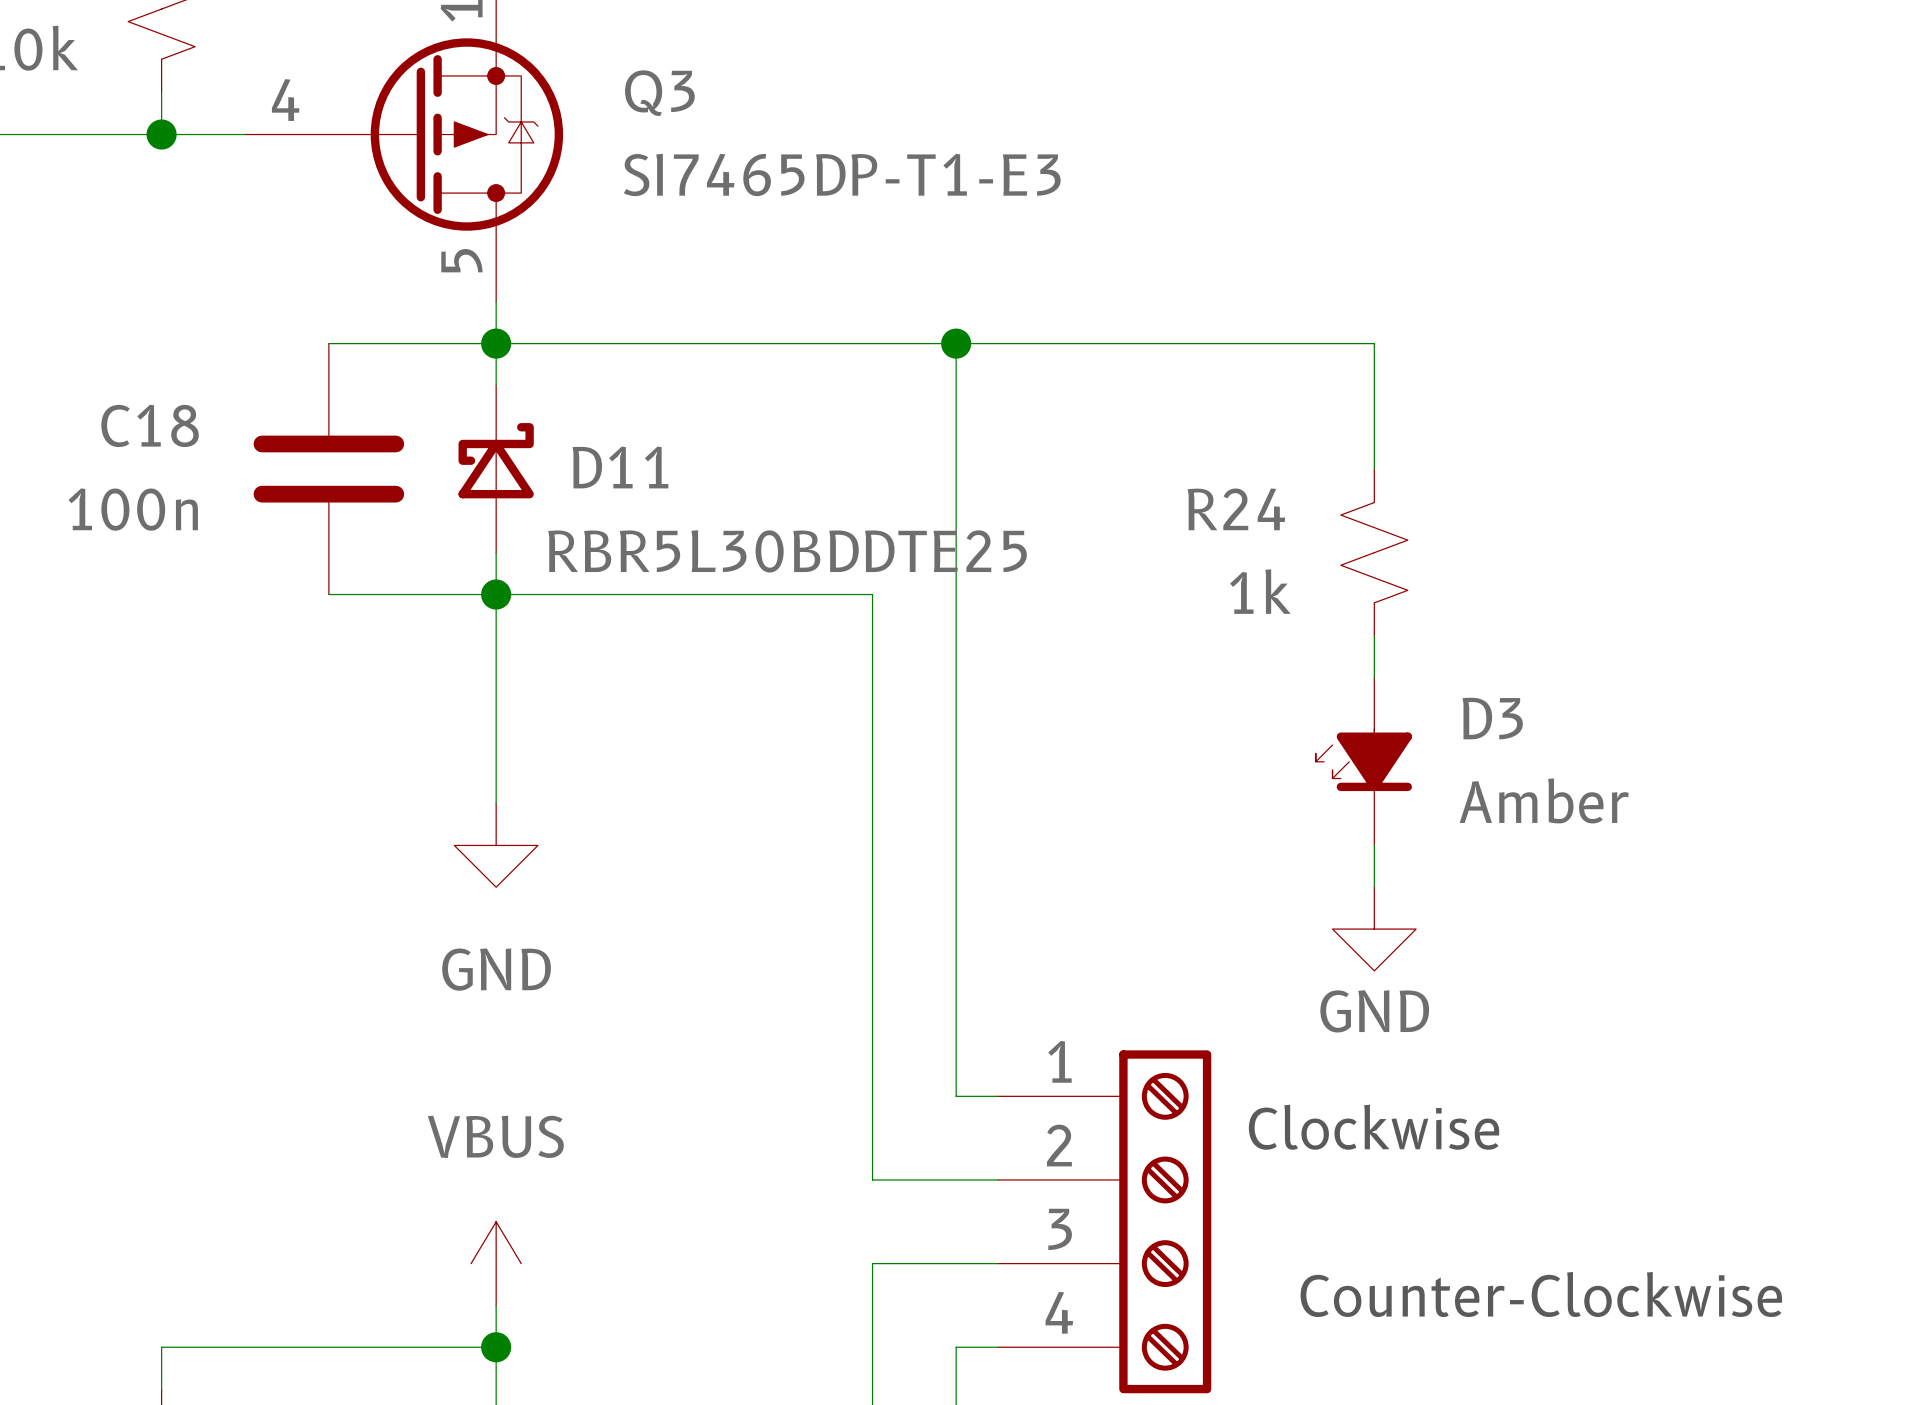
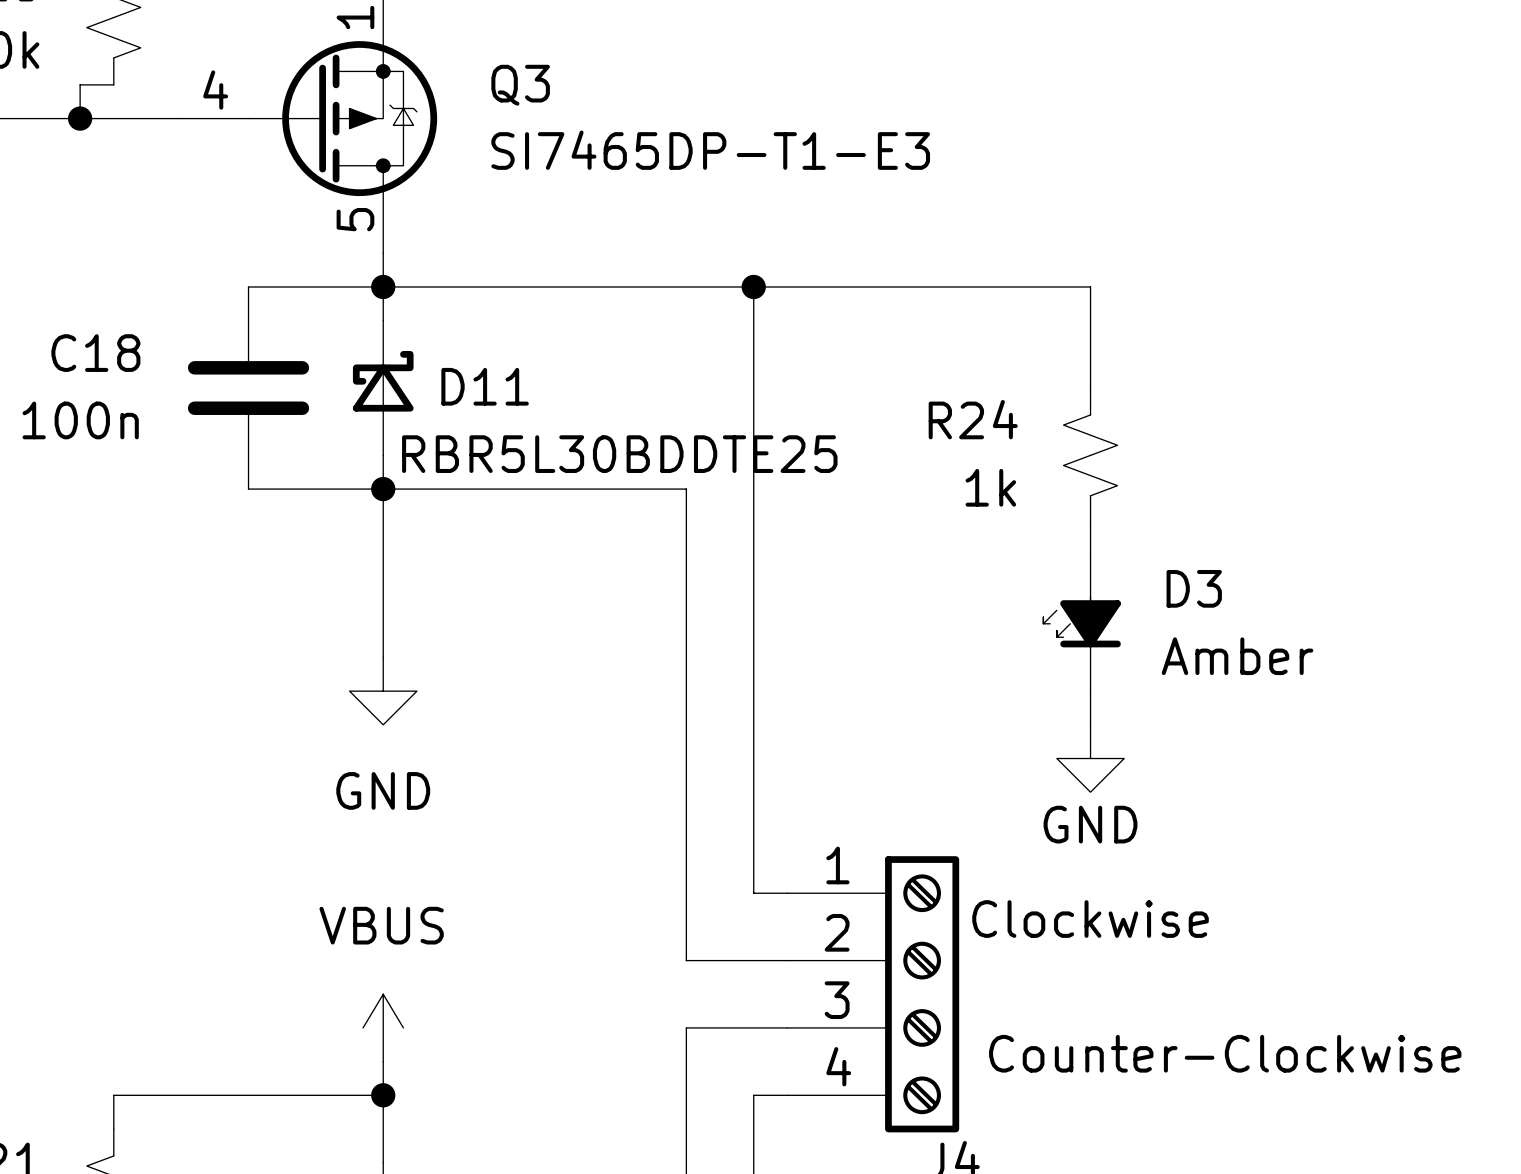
wire: (161, 92) (161, 134) -> (113, 84) (80, 84) (80, 118)
junction position: (161, 134) -> (80, 118)

